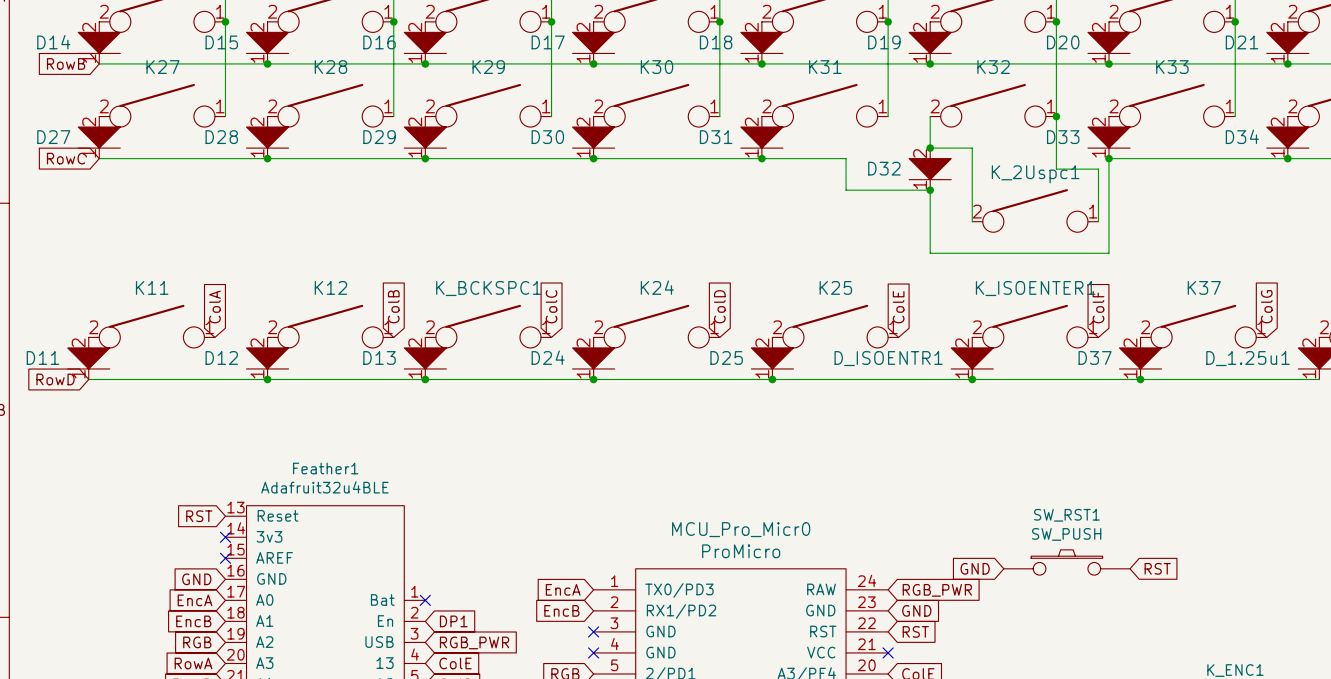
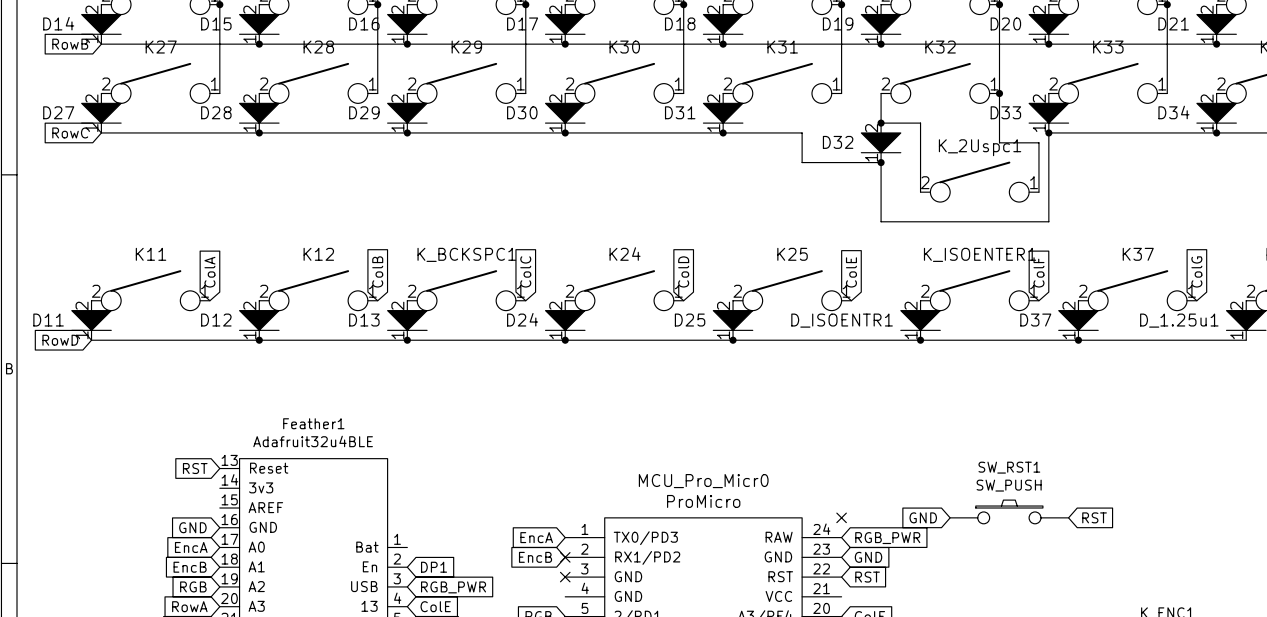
no-connect mark: (225, 537) -> none
no-connect mark: (225, 558) -> none
no-connect mark: none -> (841, 517)
no-connect mark: (425, 600) -> none
no-connect mark: none -> (565, 557)
no-connect mark: (593, 652) -> none
no-connect mark: (888, 652) -> none

